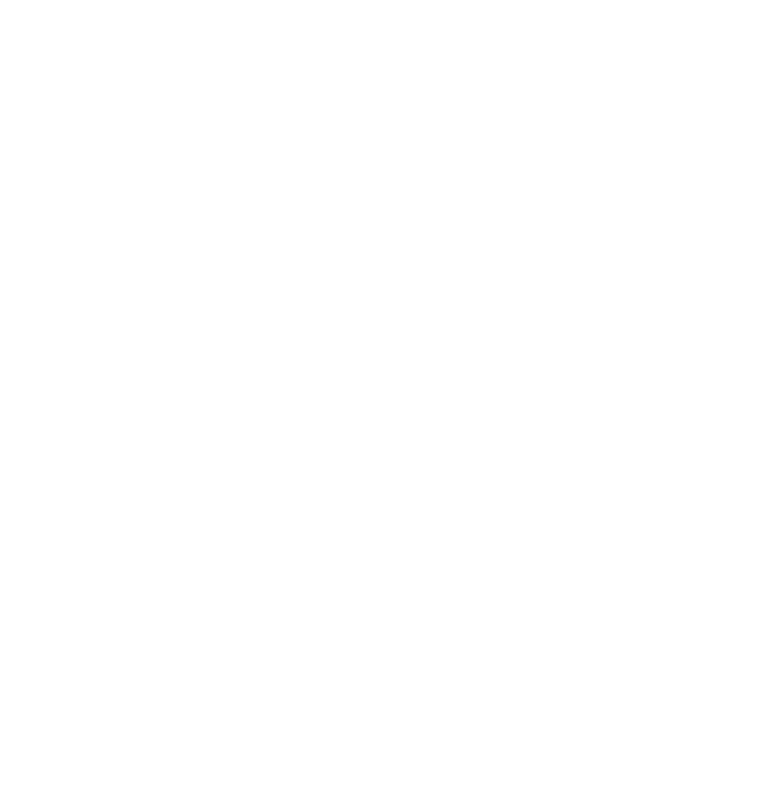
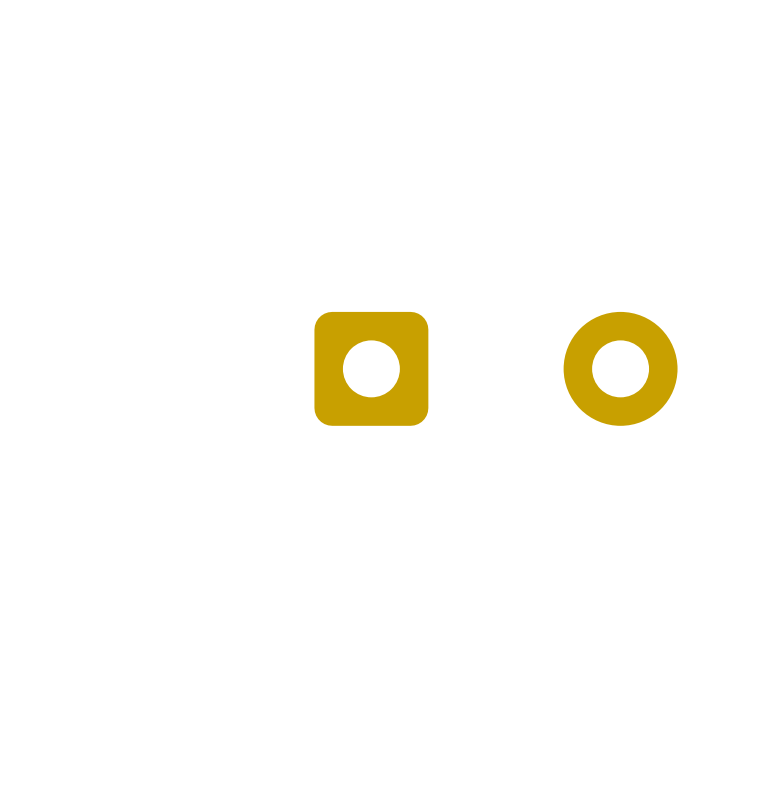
part: none -> (495, 368)

